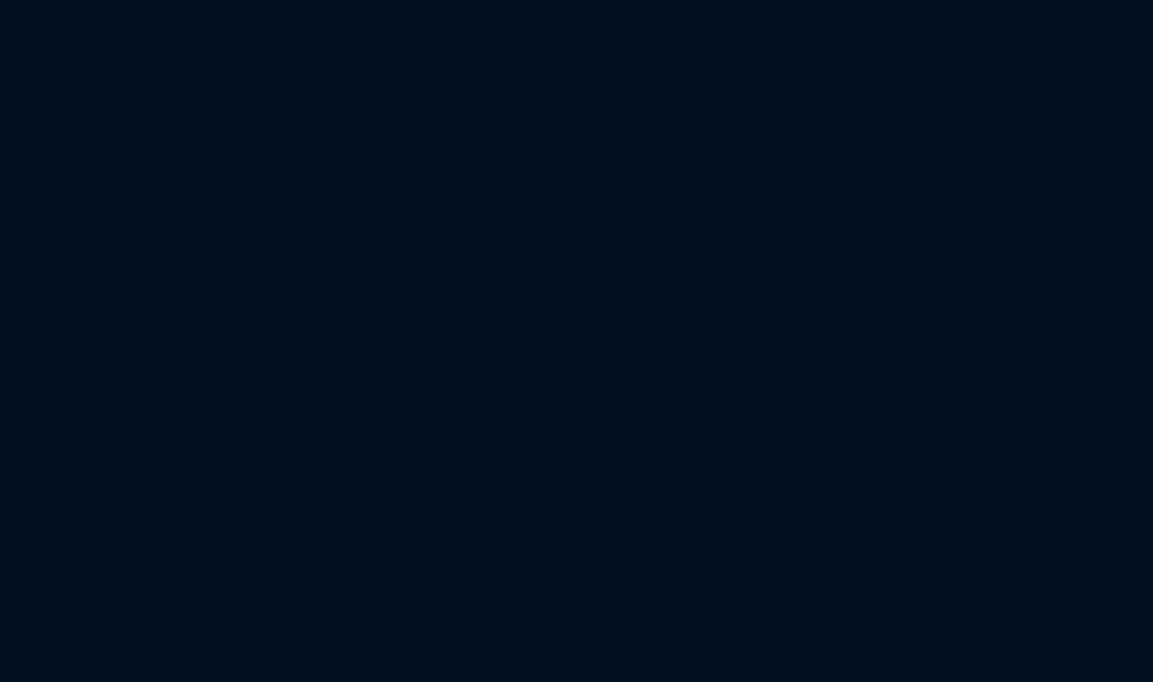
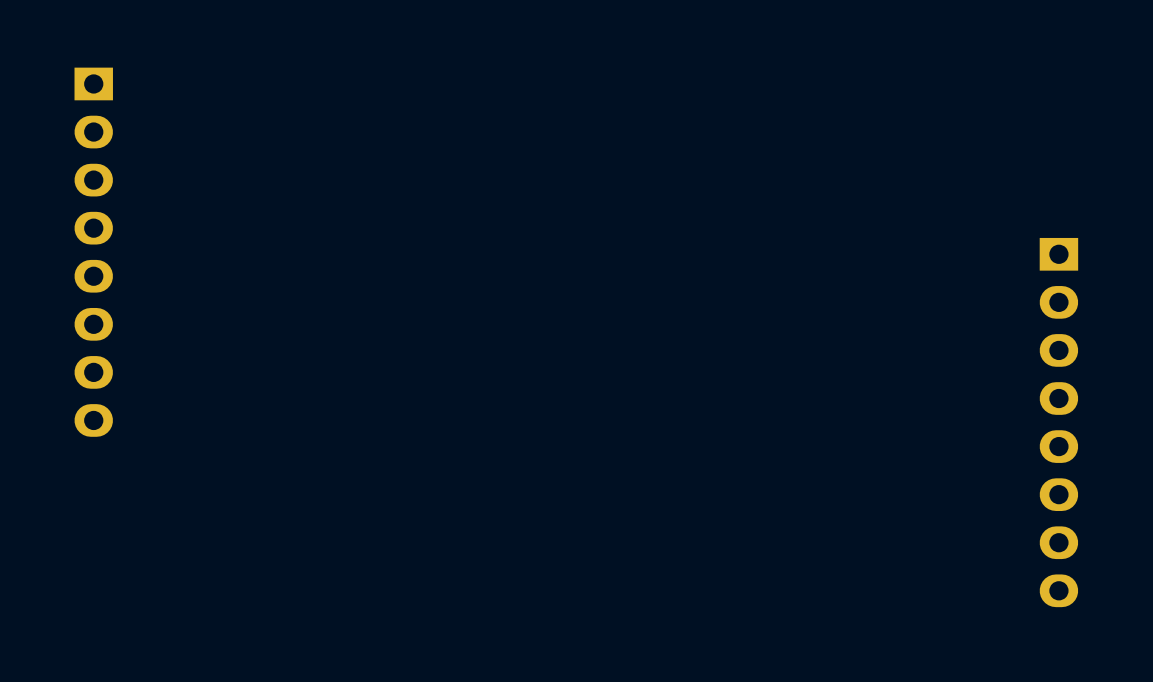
part: none -> (93, 252)
part: none -> (1058, 422)

